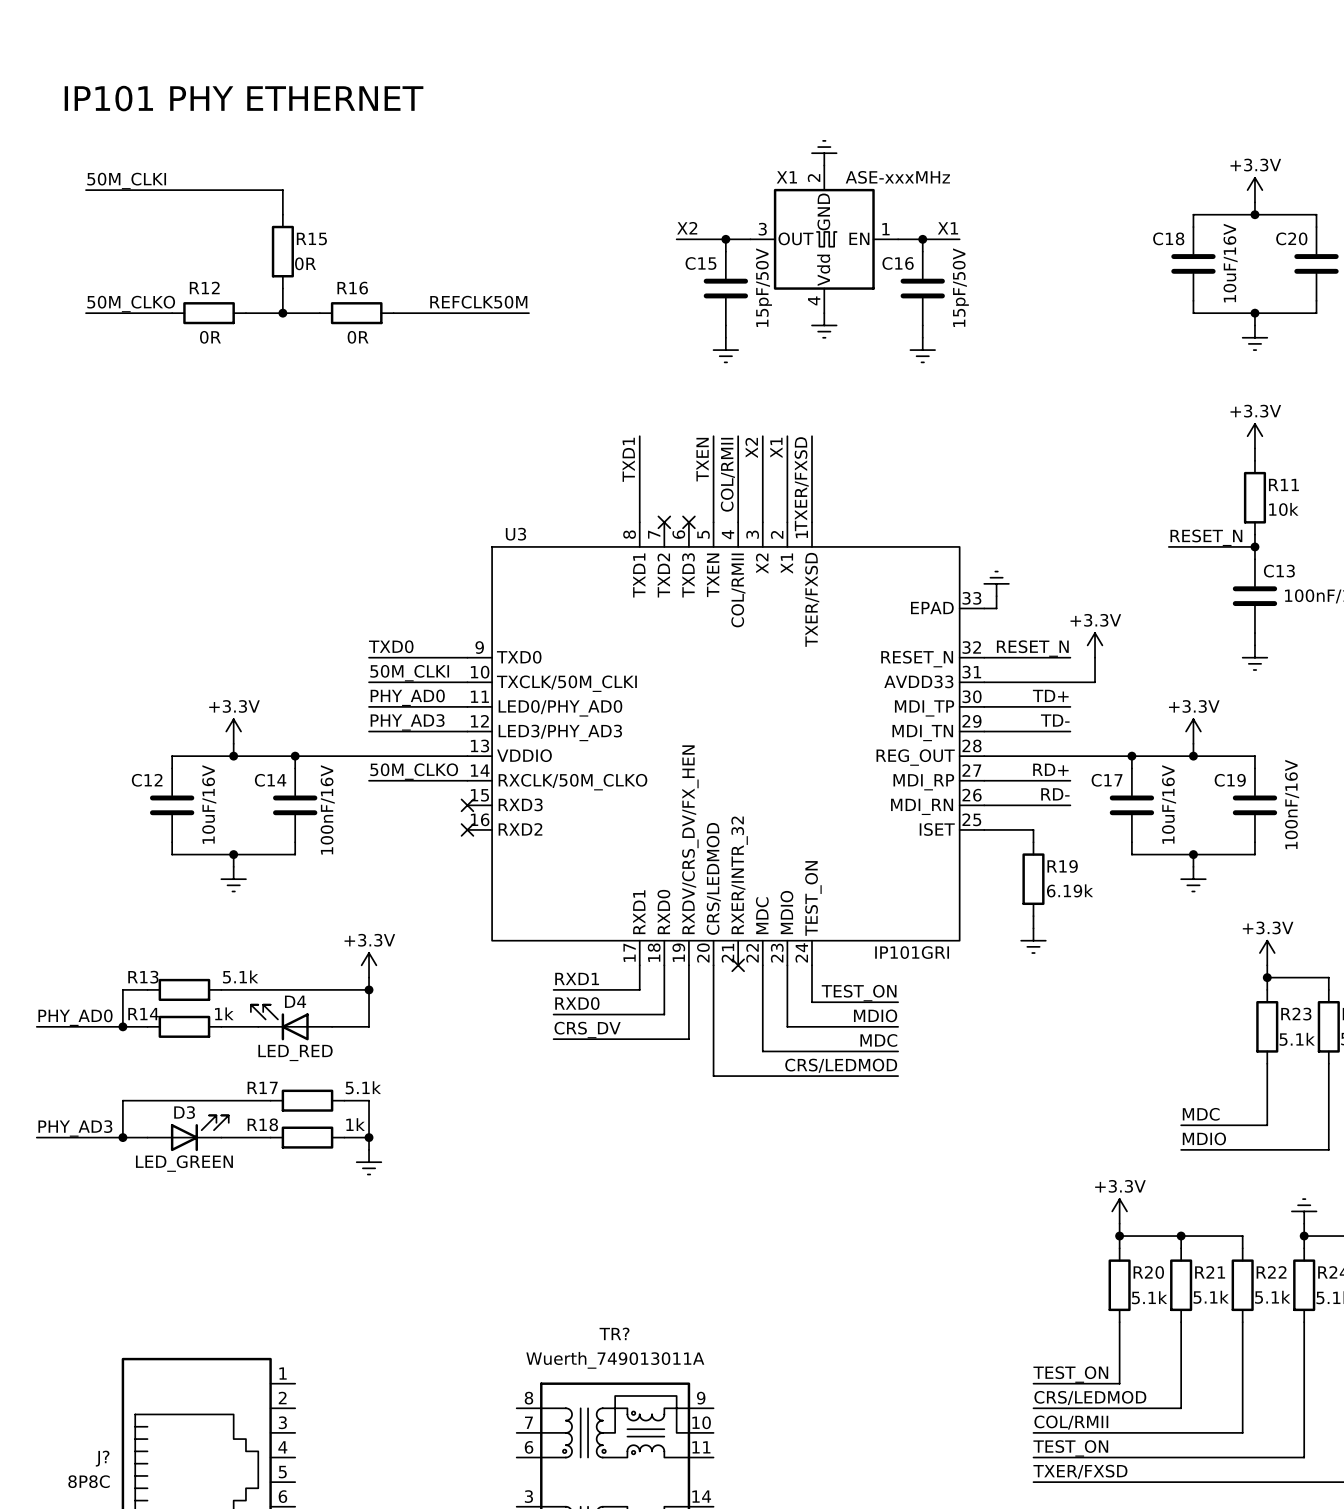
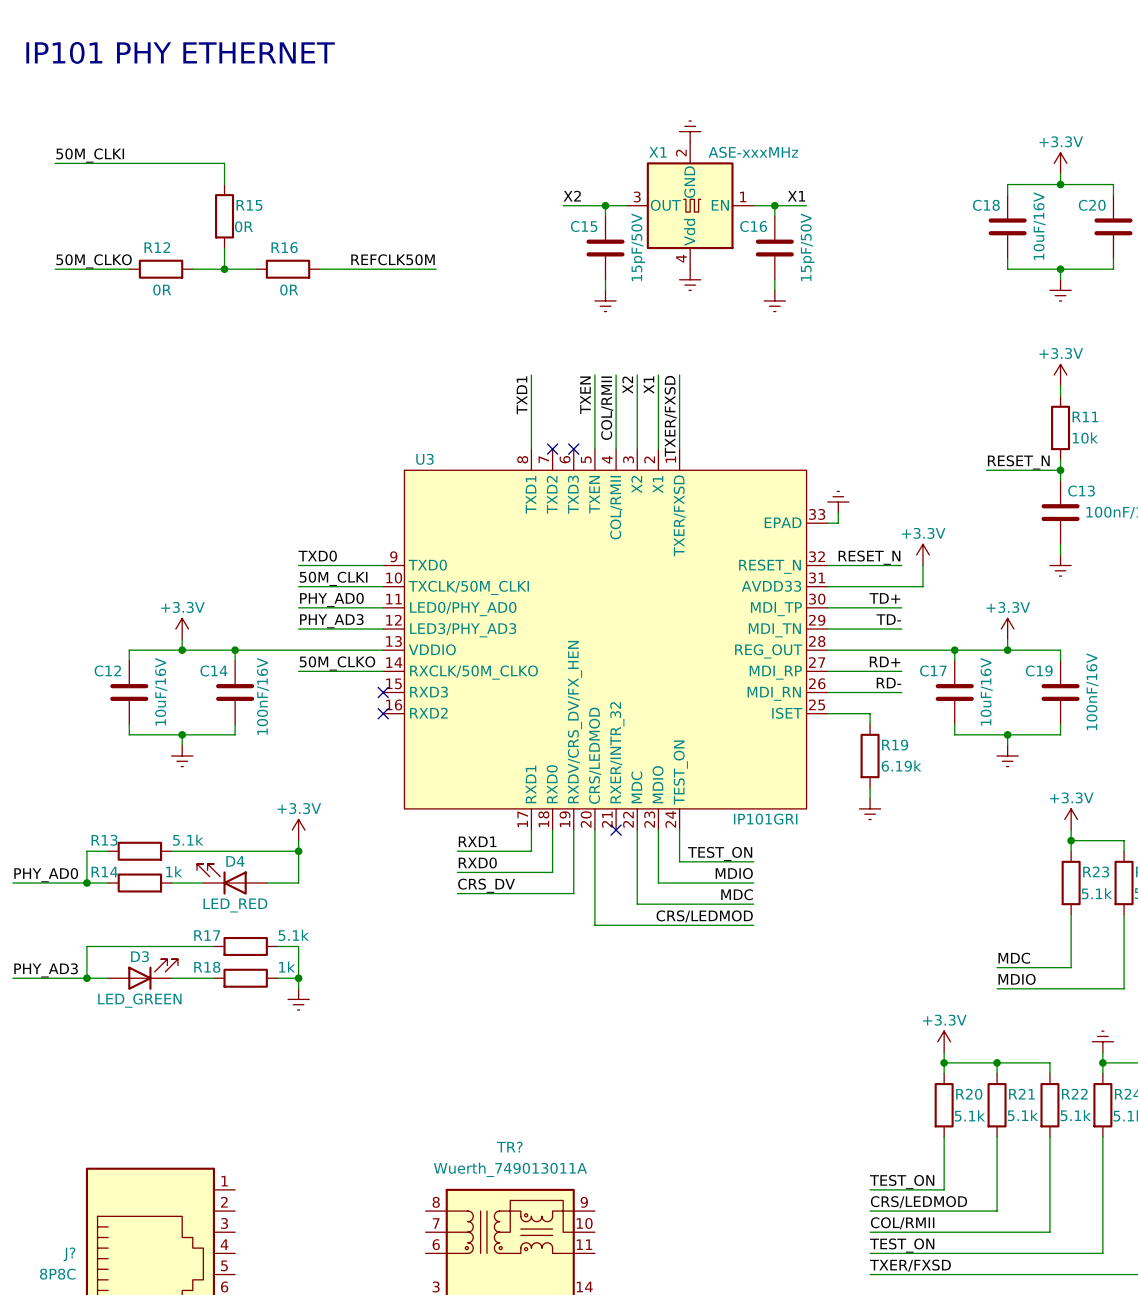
text position: IP101 PHY ETHERNET (244, 98) -> IP101 PHY ETHERNET (180, 52)

